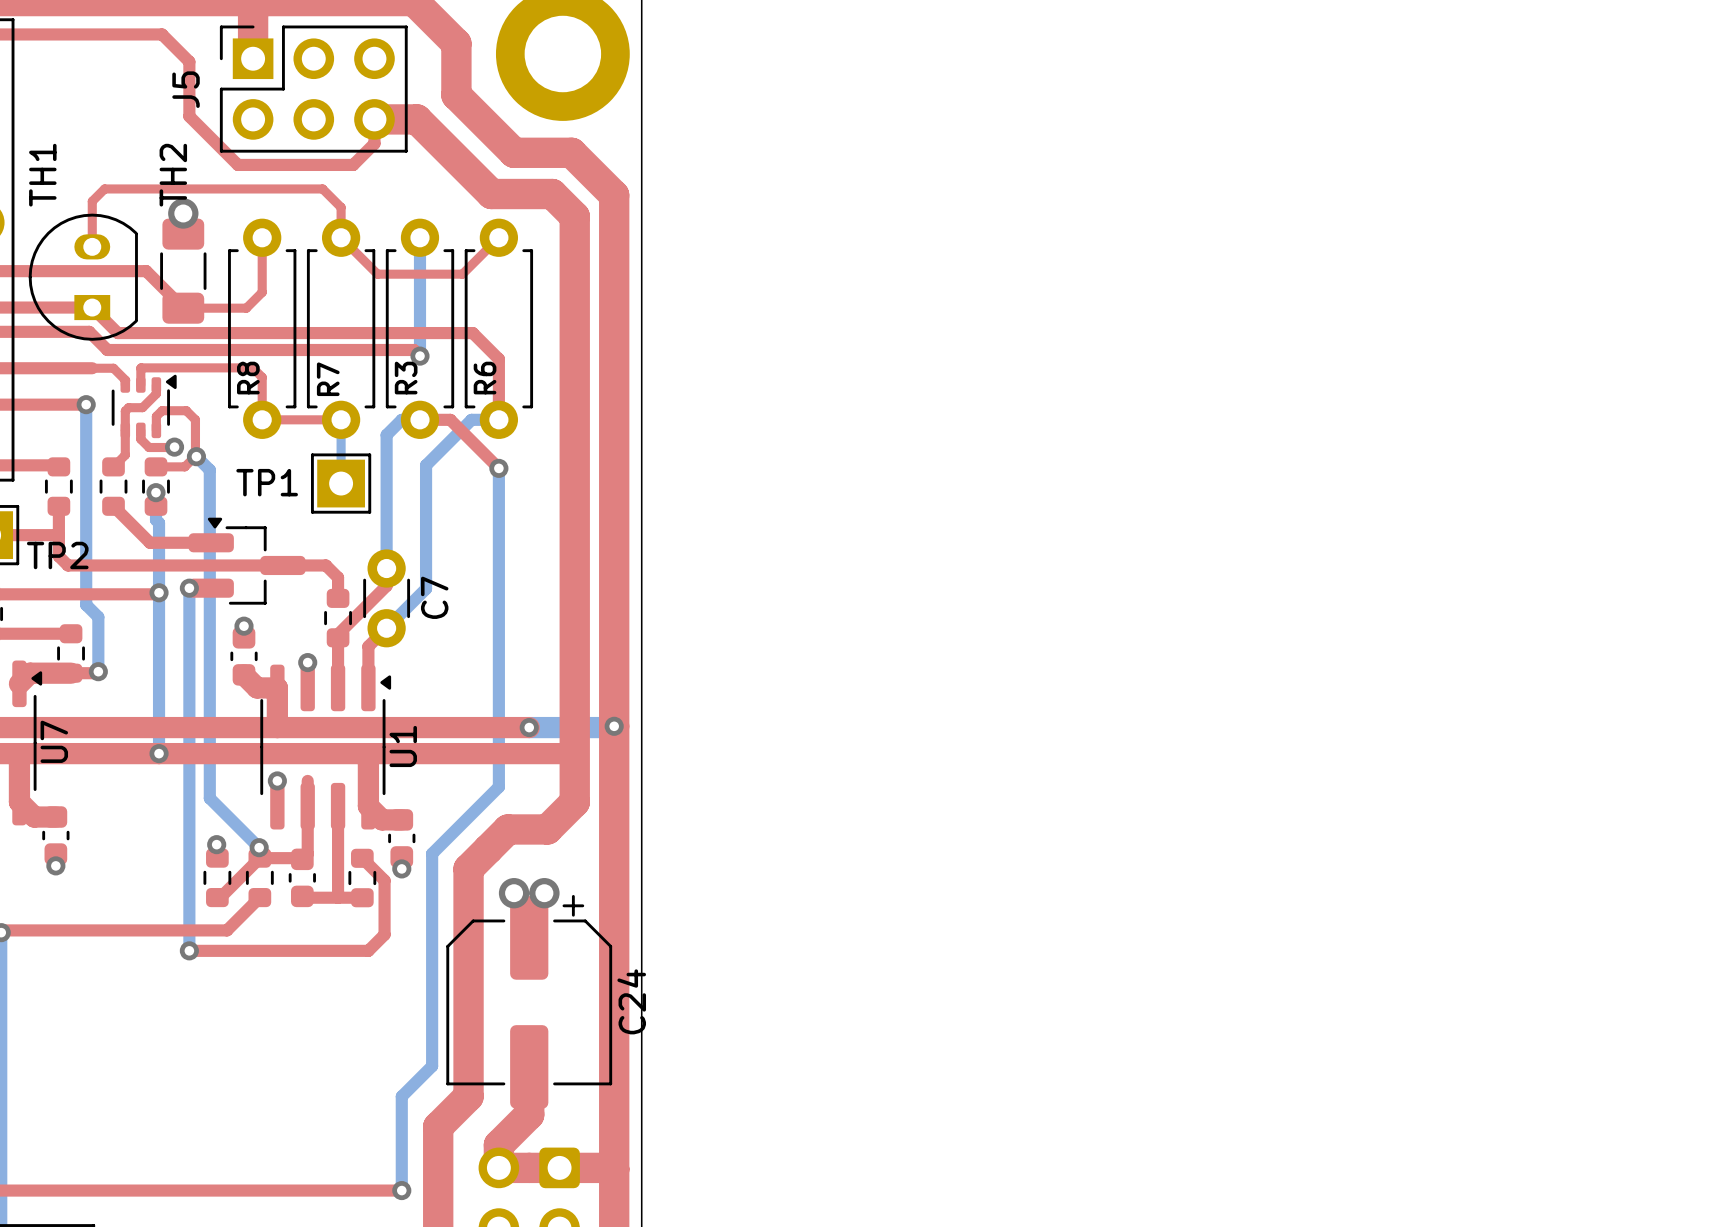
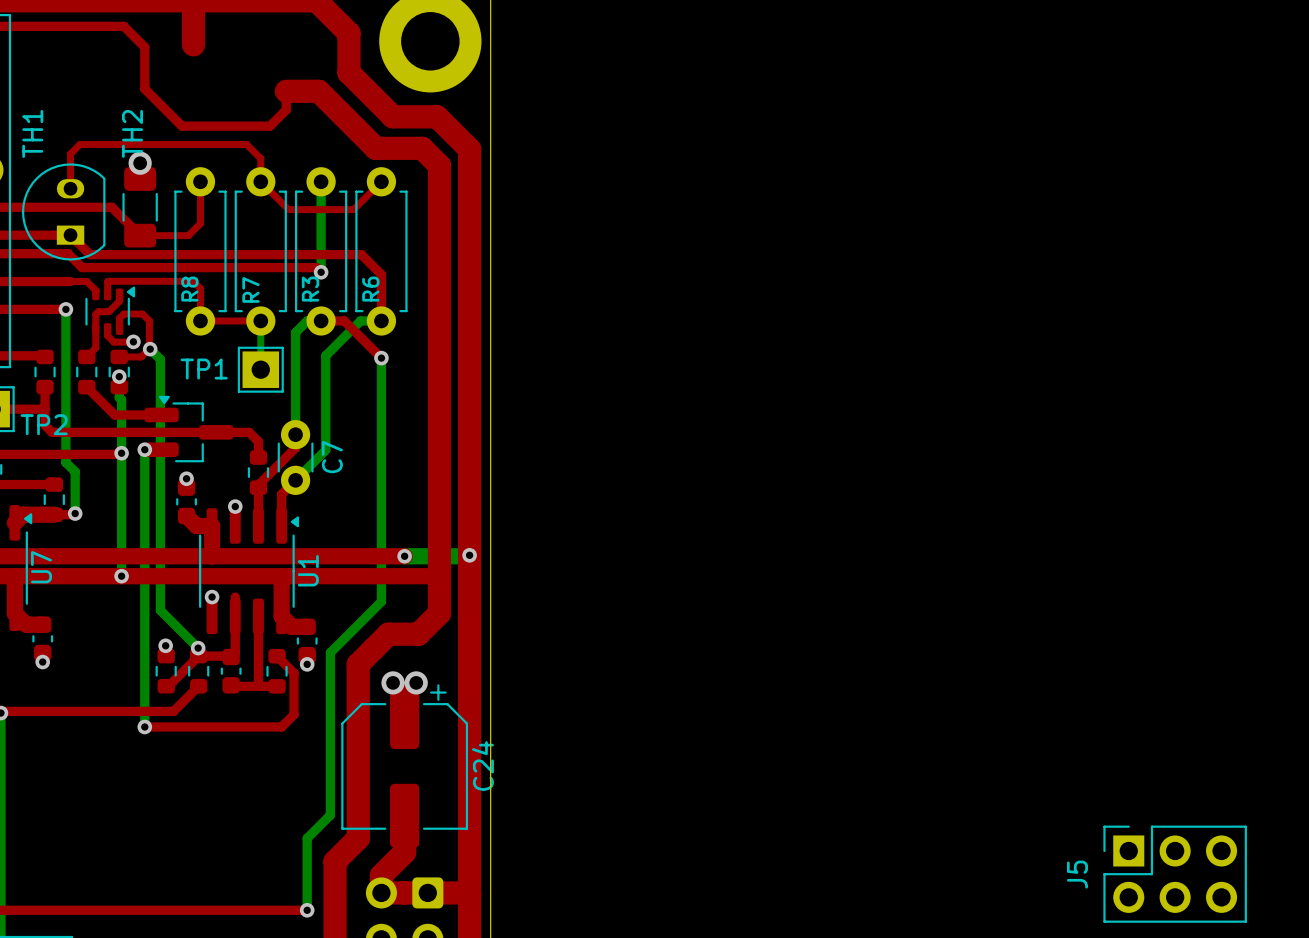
J5 position: (313, 89) -> (1175, 874)

